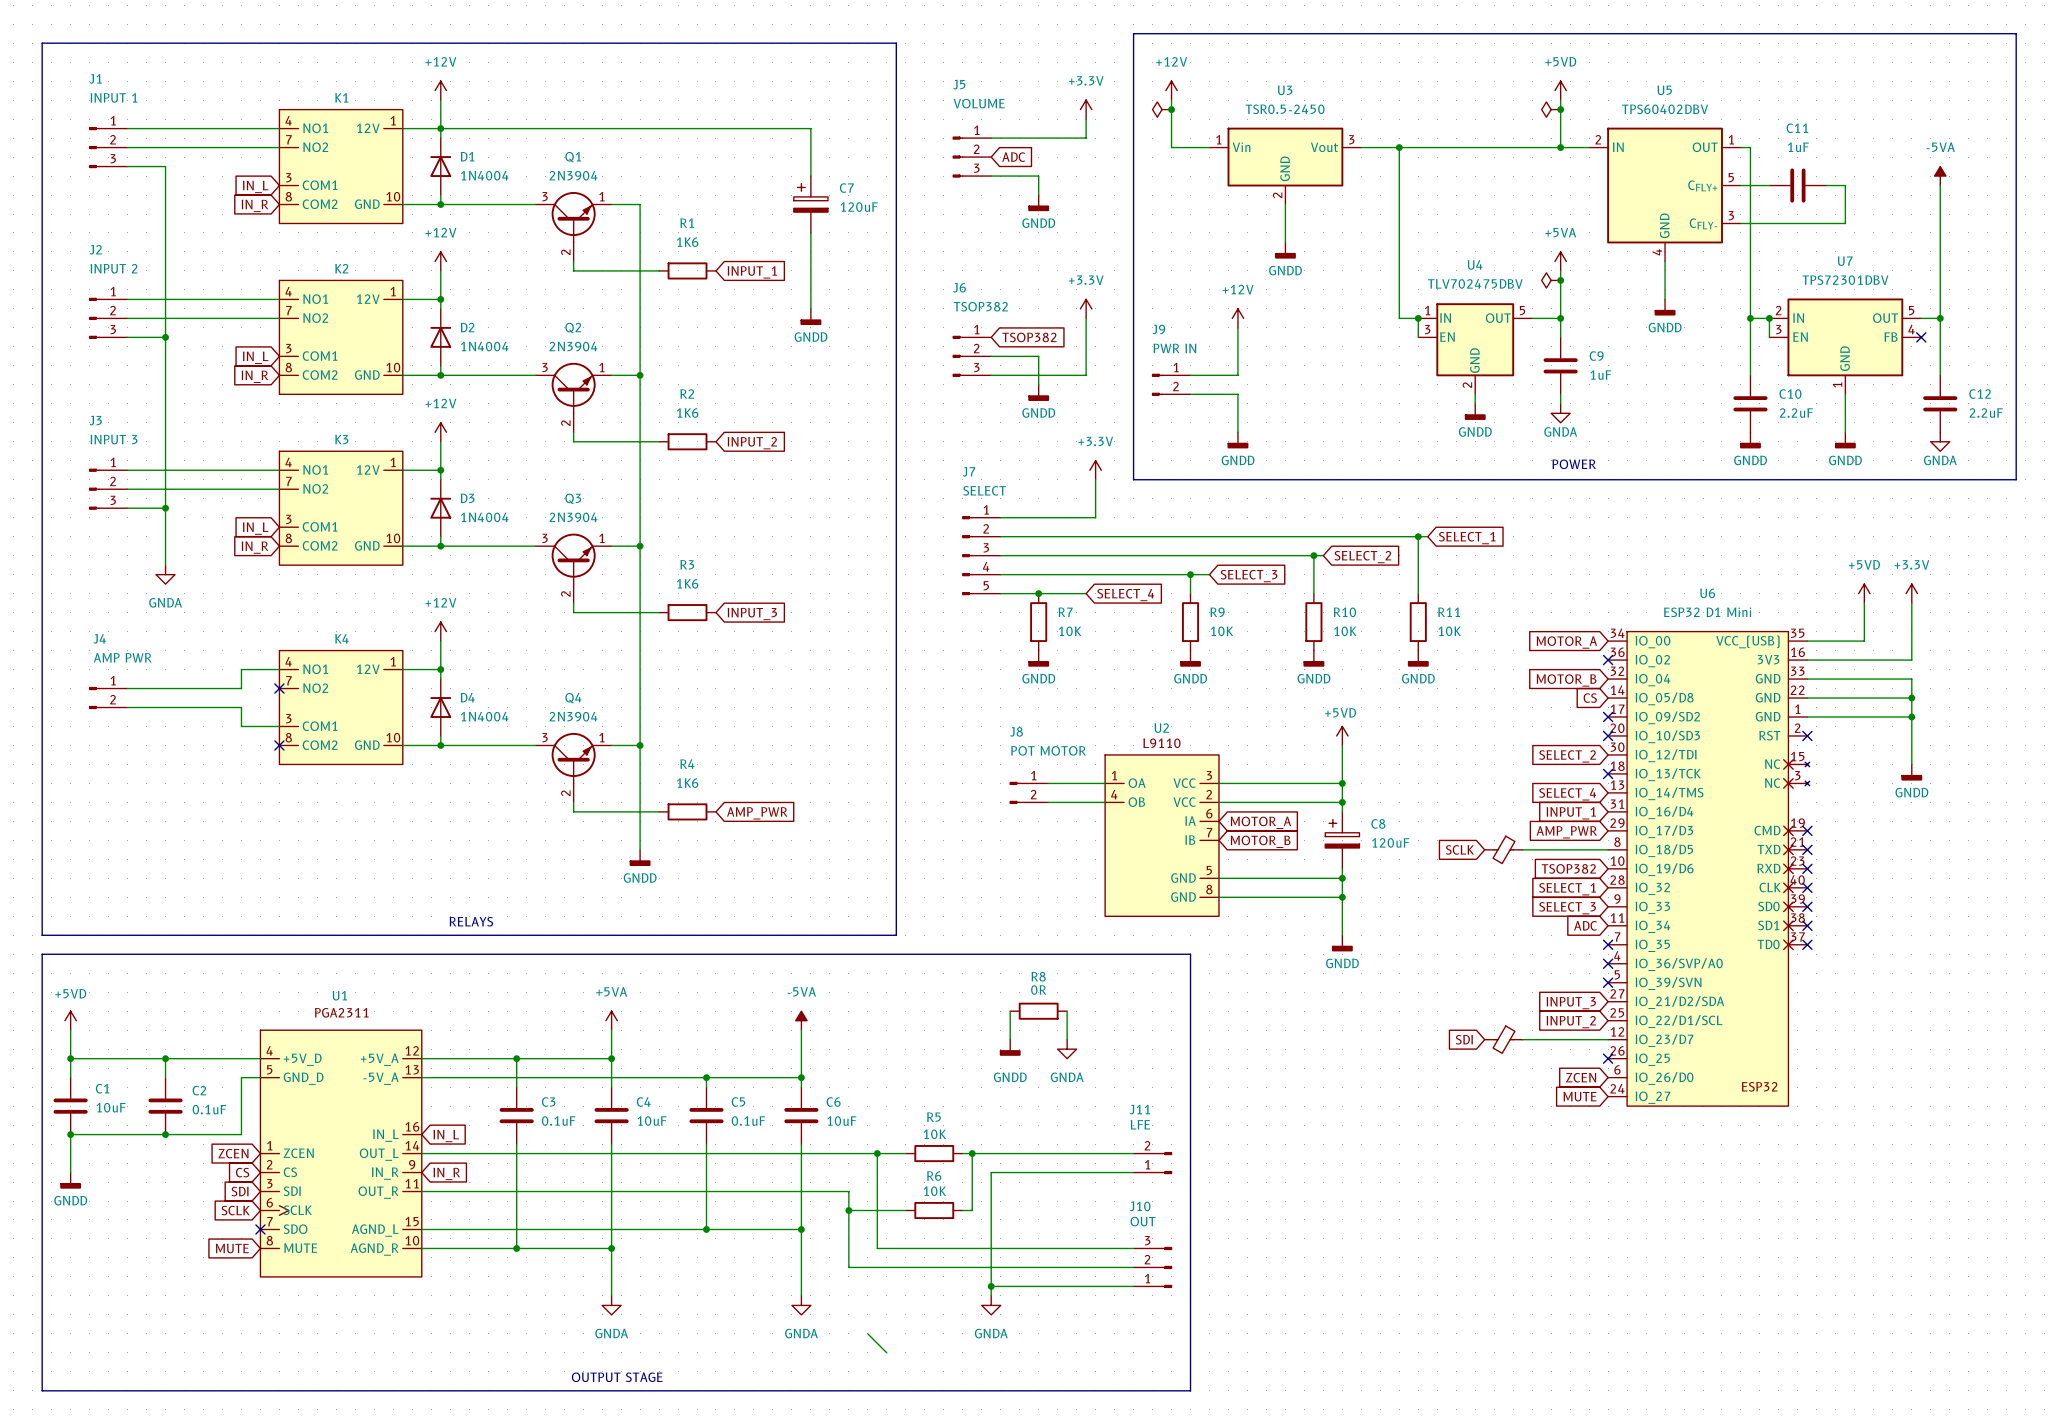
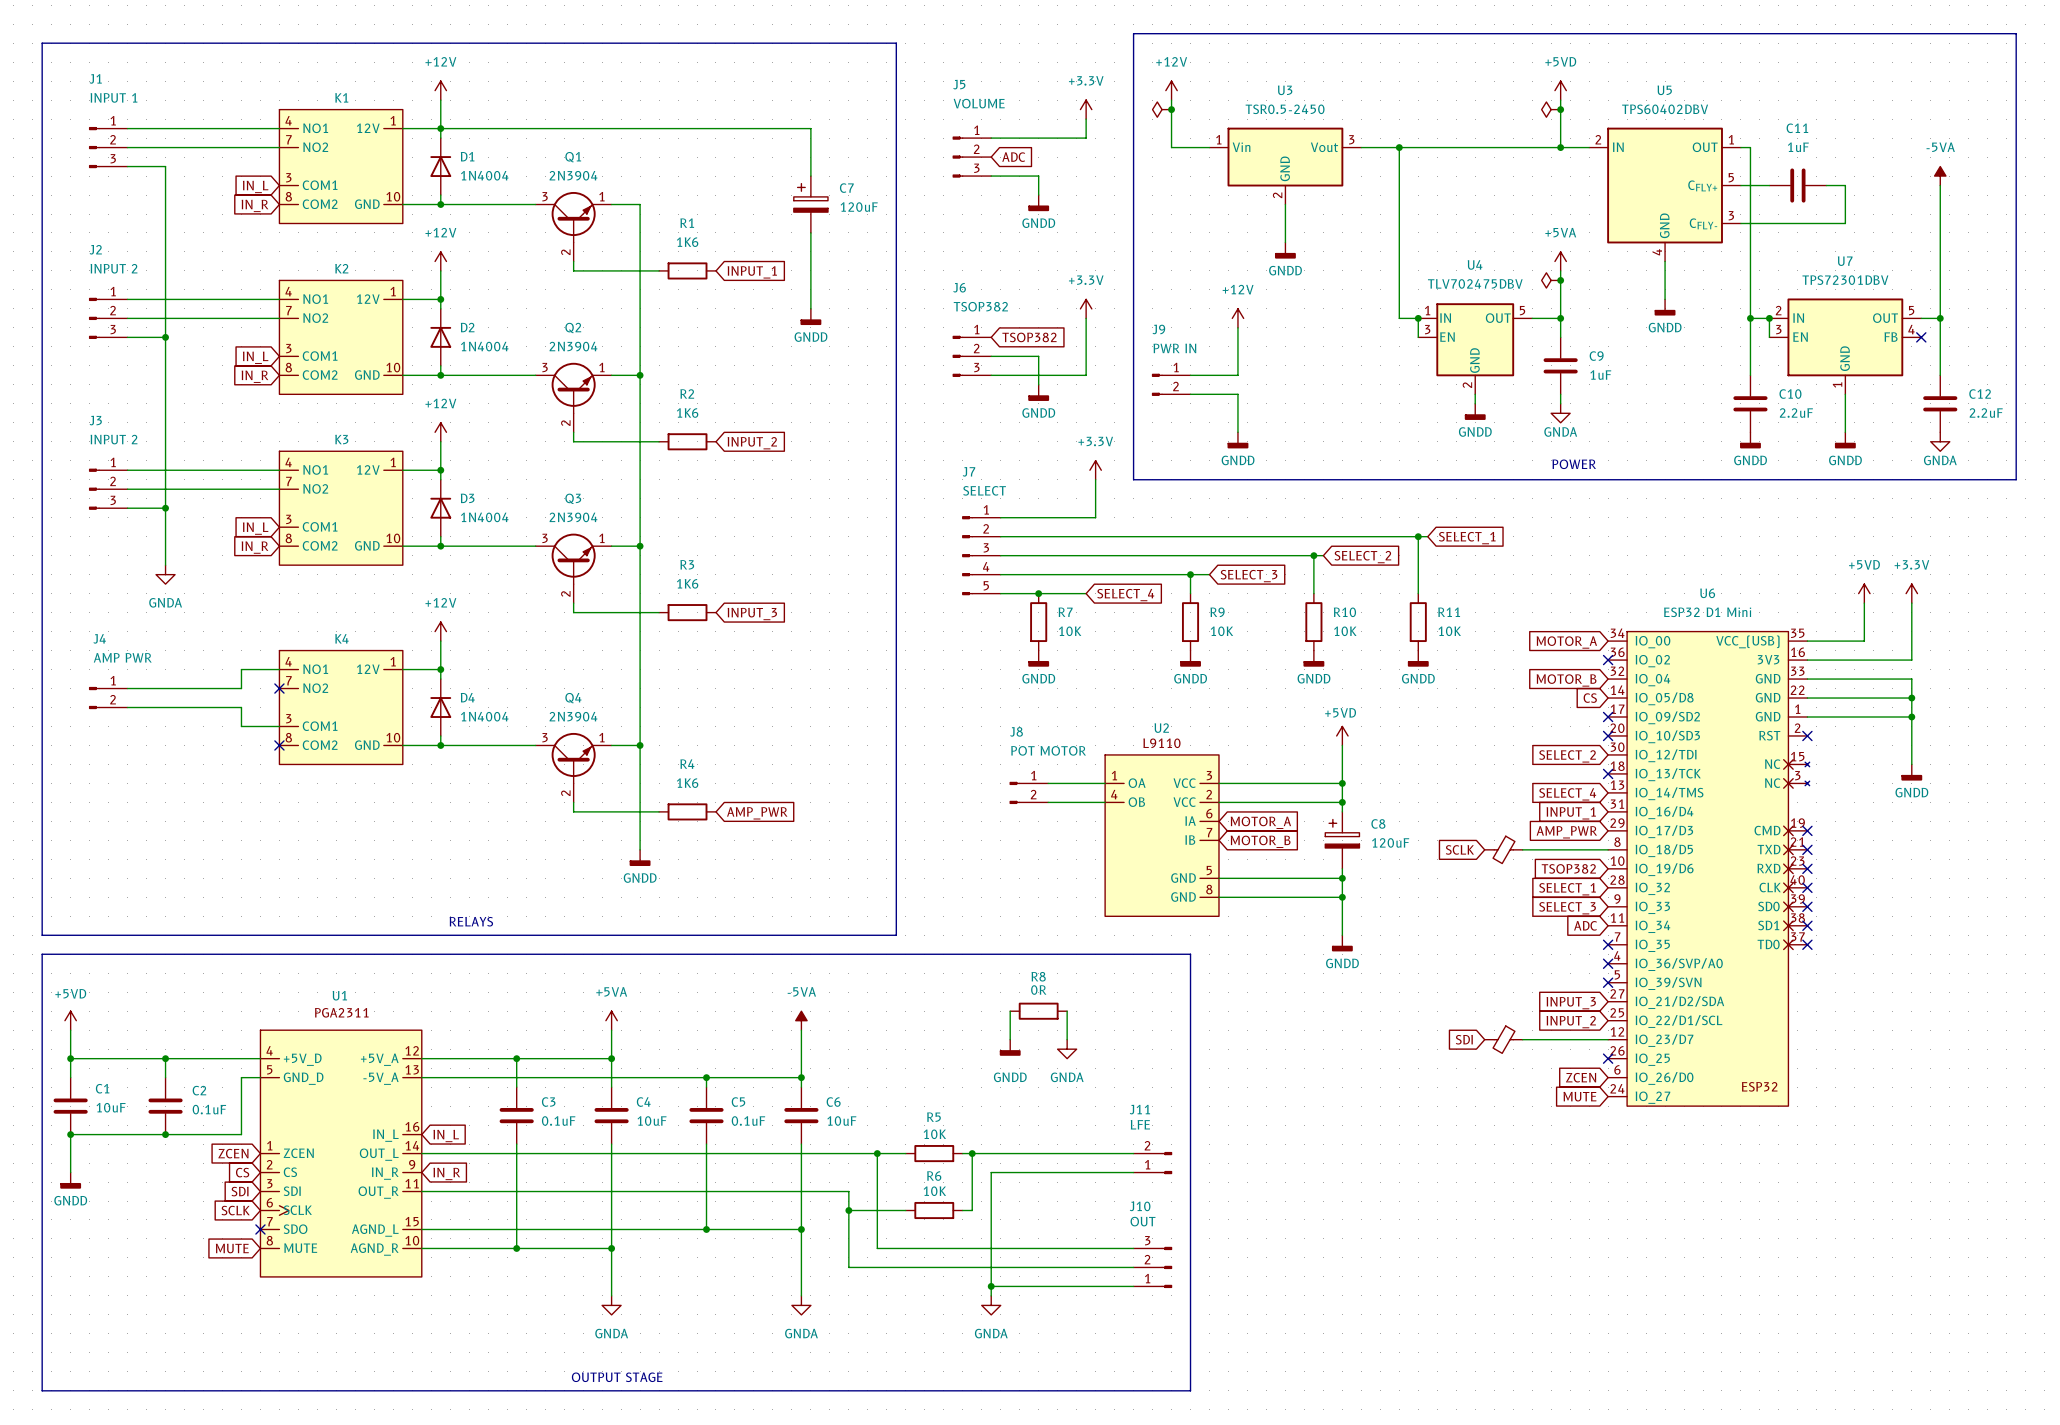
J3 value: INPUT 3 (114, 439) -> INPUT 2 (114, 439)
wire: (867, 1333) (886, 1352) -> none

